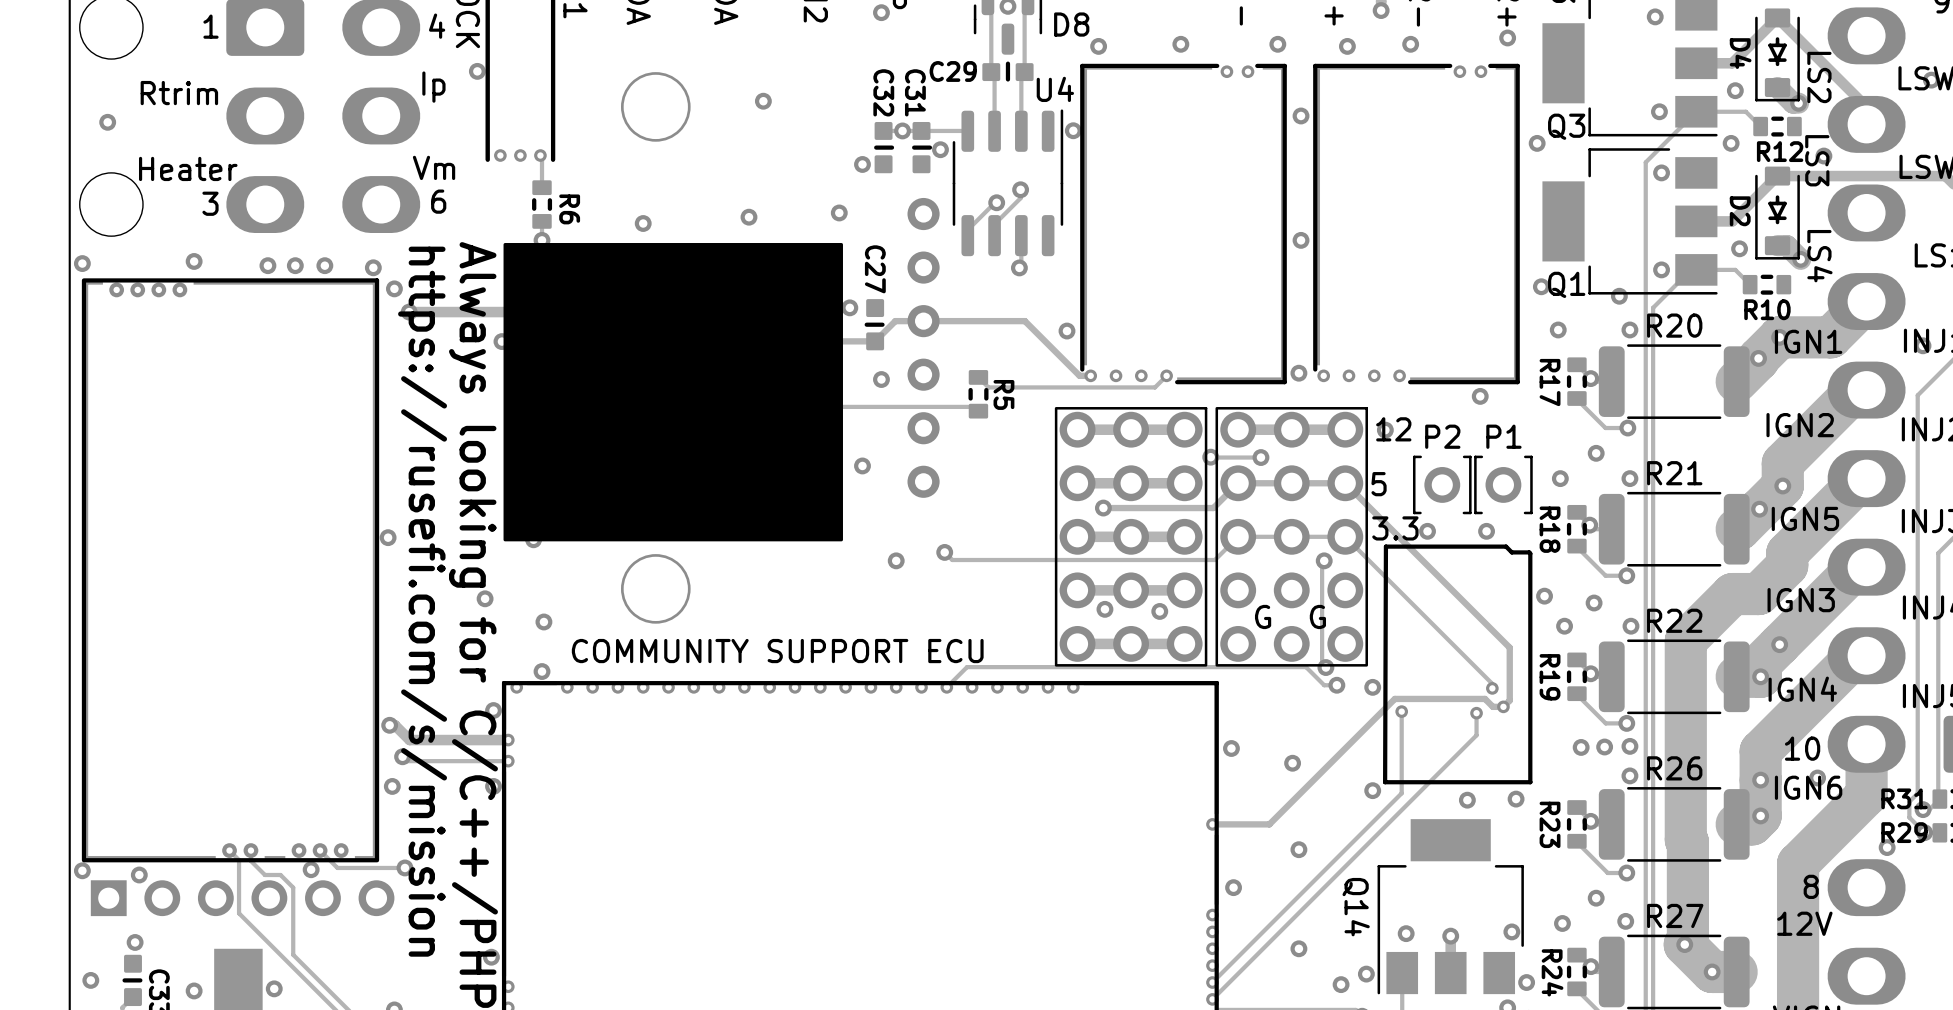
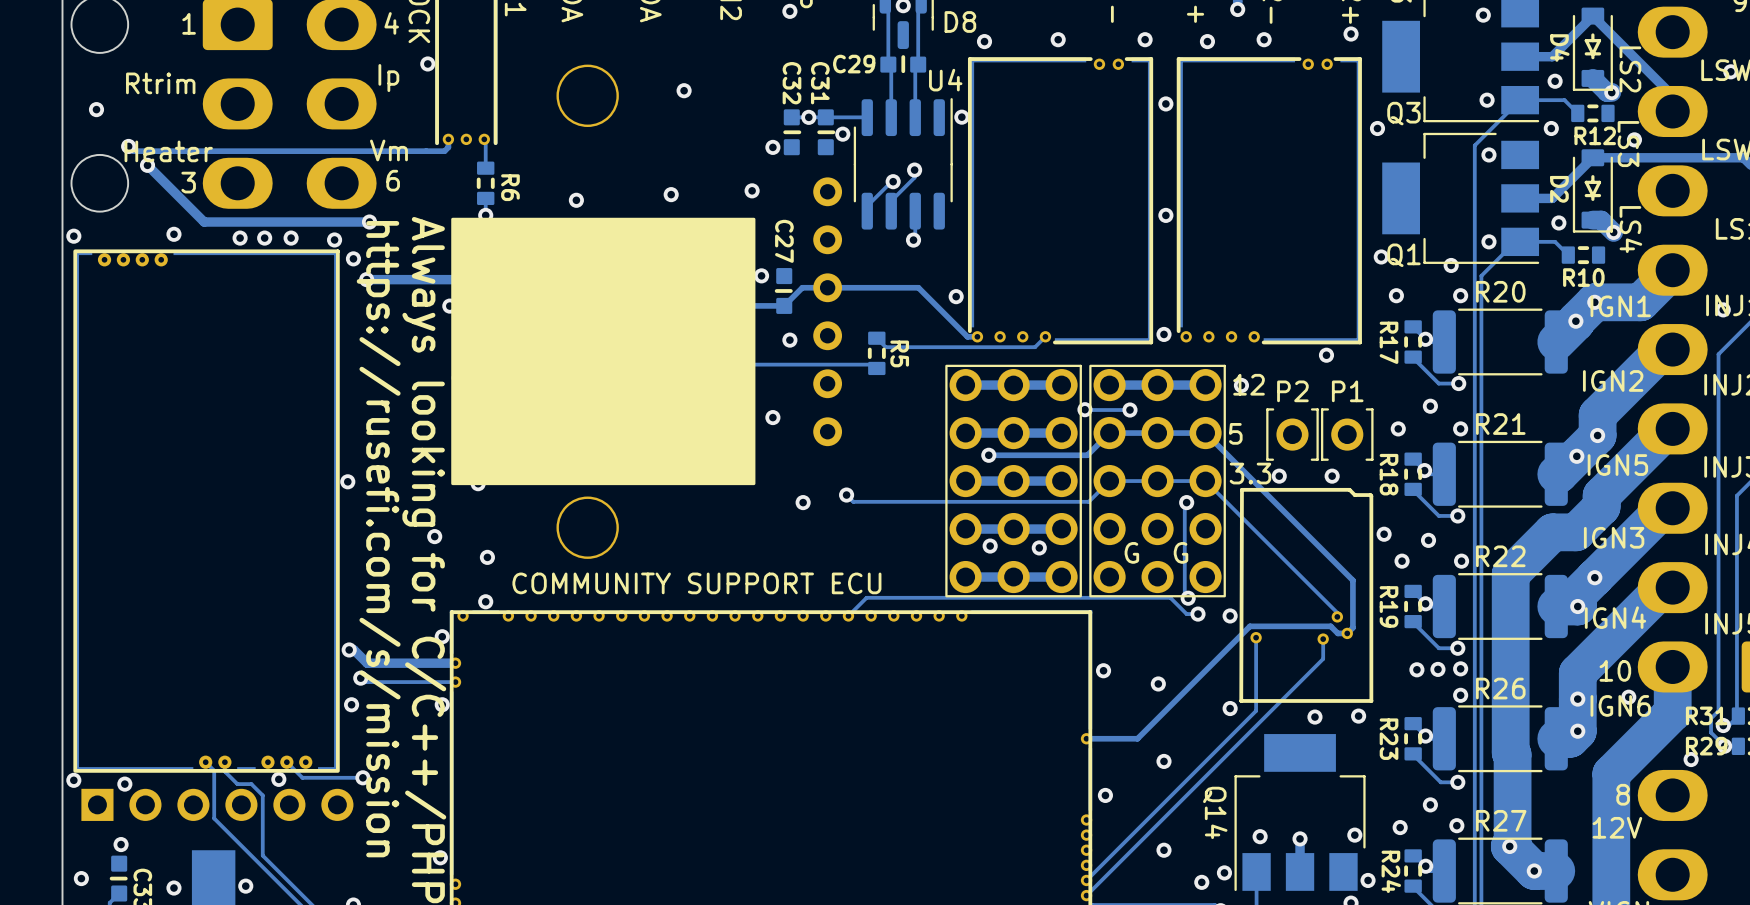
track: none -> (448, 139) (448, 147) (444, 151) (133, 151) (128, 146)
via: none -> (128, 146)
track: none -> (147, 165) (204, 222) (369, 222)
via: none -> (147, 165)
via: none -> (369, 222)

